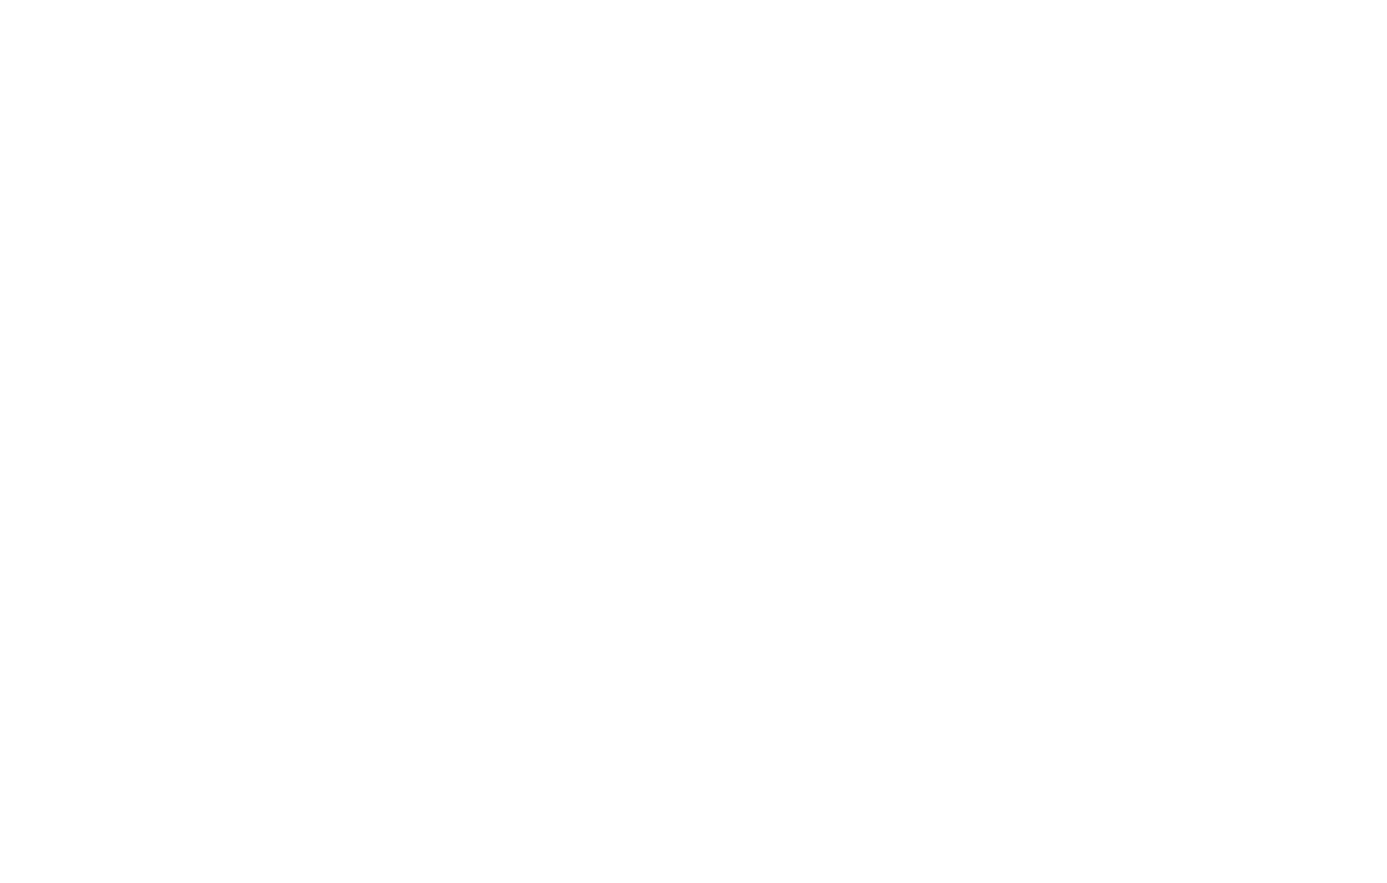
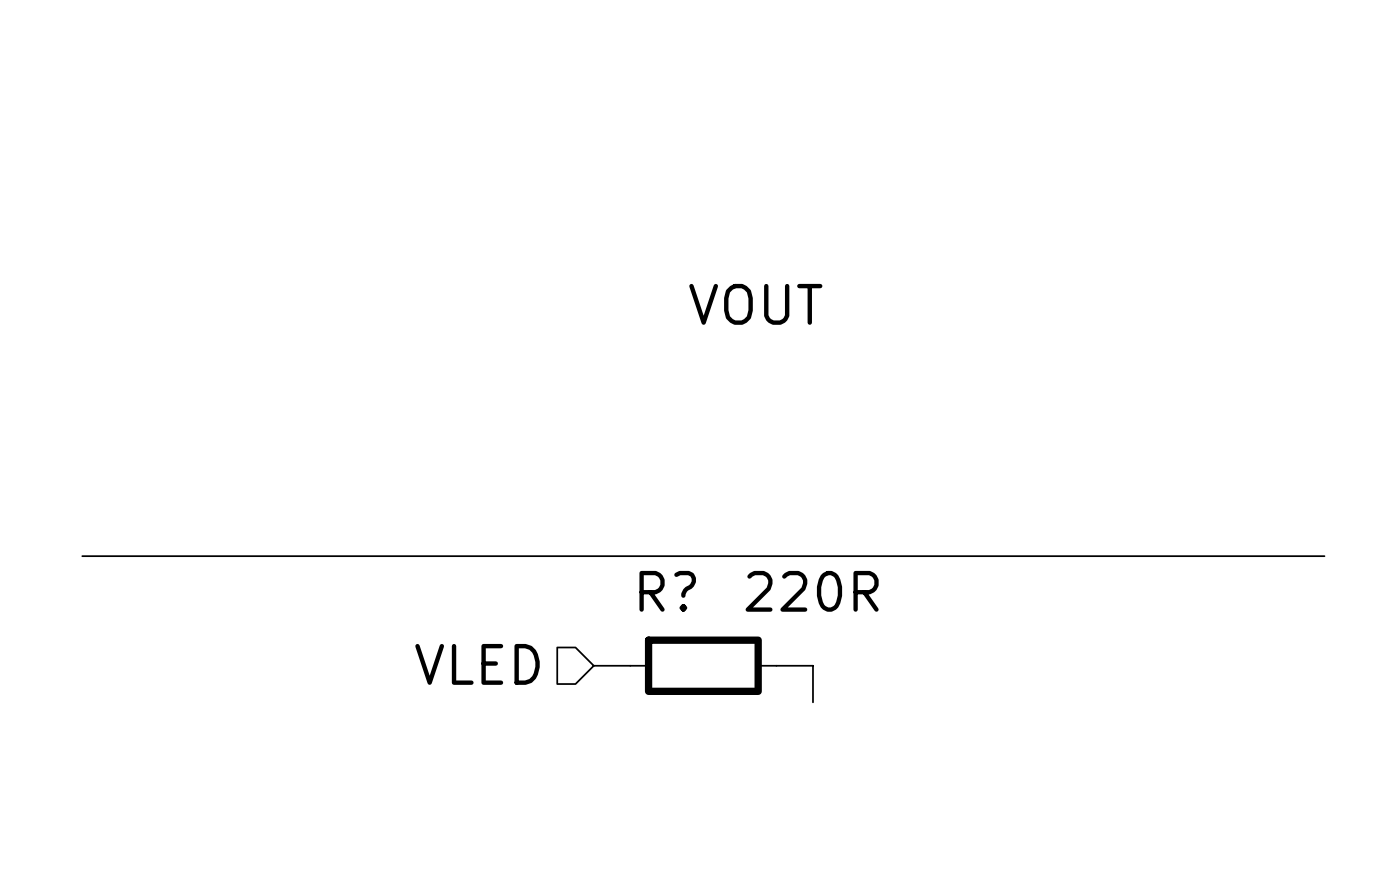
label: none -> VOUT (755, 304)
wire: none -> (82, 556) (1324, 556)
hierarchical label: none -> VLED (477, 664)
wire: none -> (593, 665) (630, 665)
R?: none -> (703, 665)
wire: none -> (776, 665) (812, 665) (812, 702)

